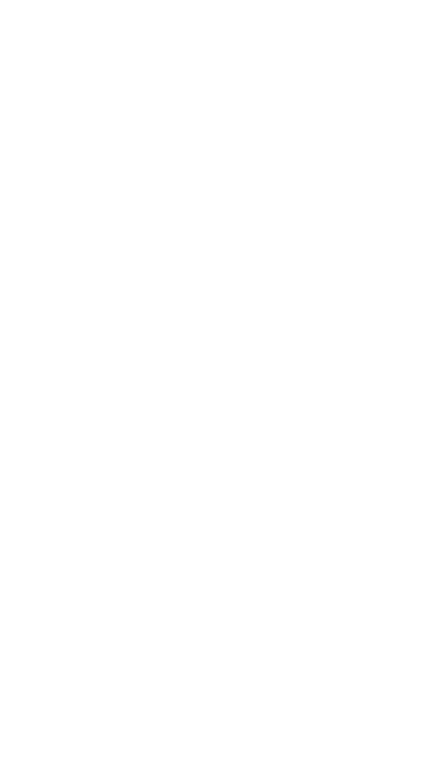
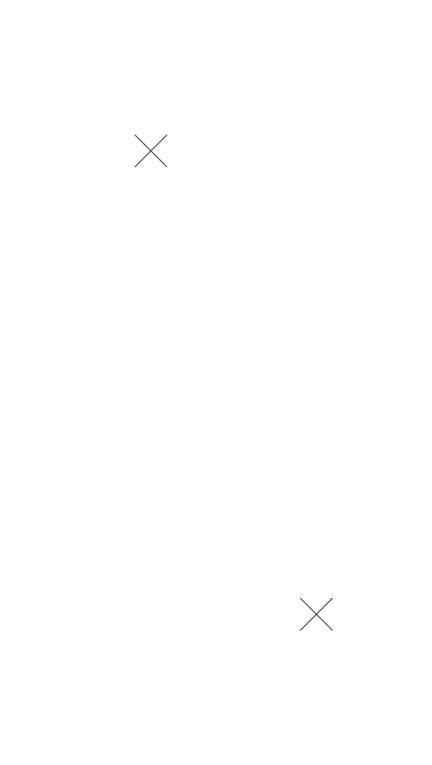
no-connect mark: none -> (150, 150)
no-connect mark: none -> (316, 614)

